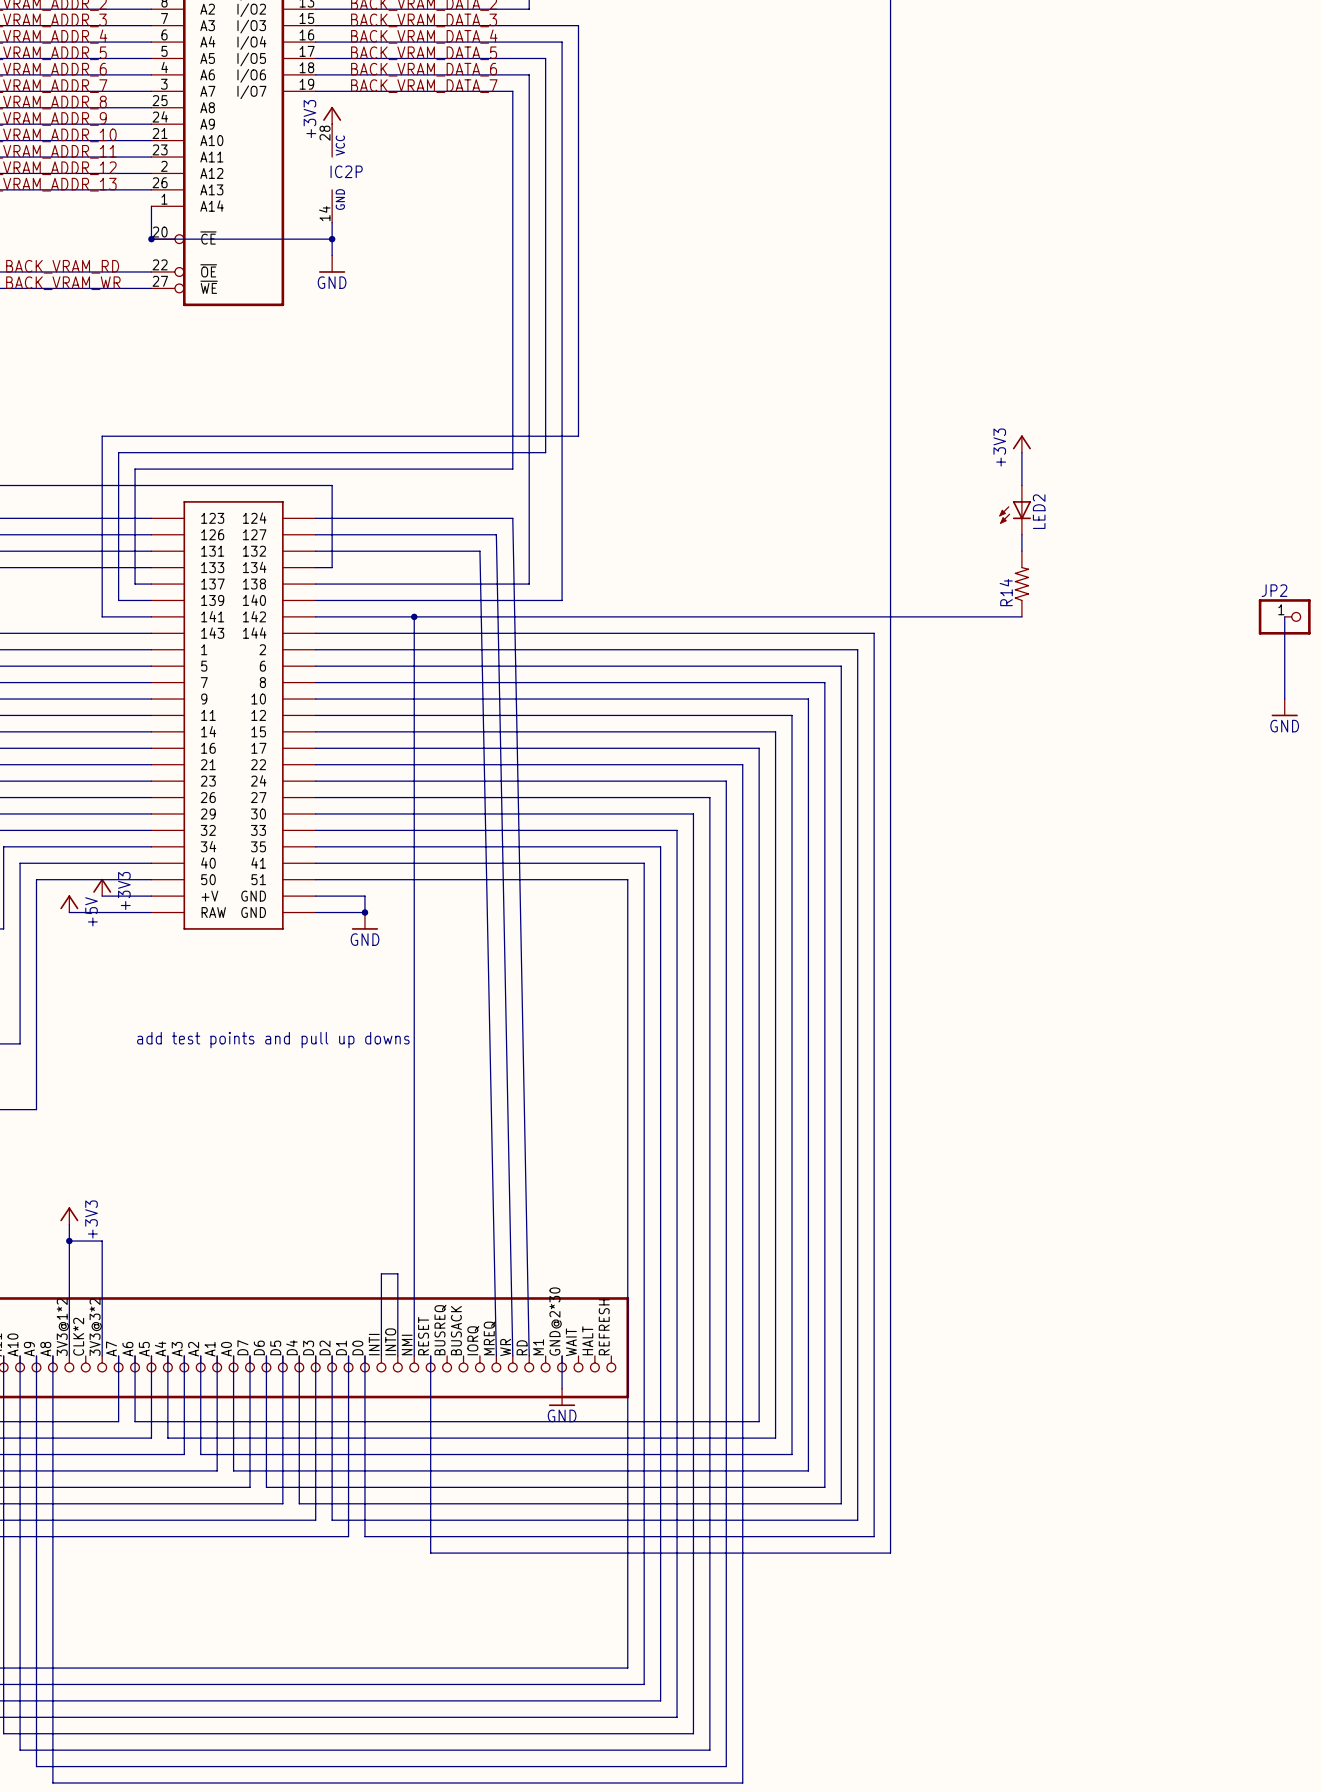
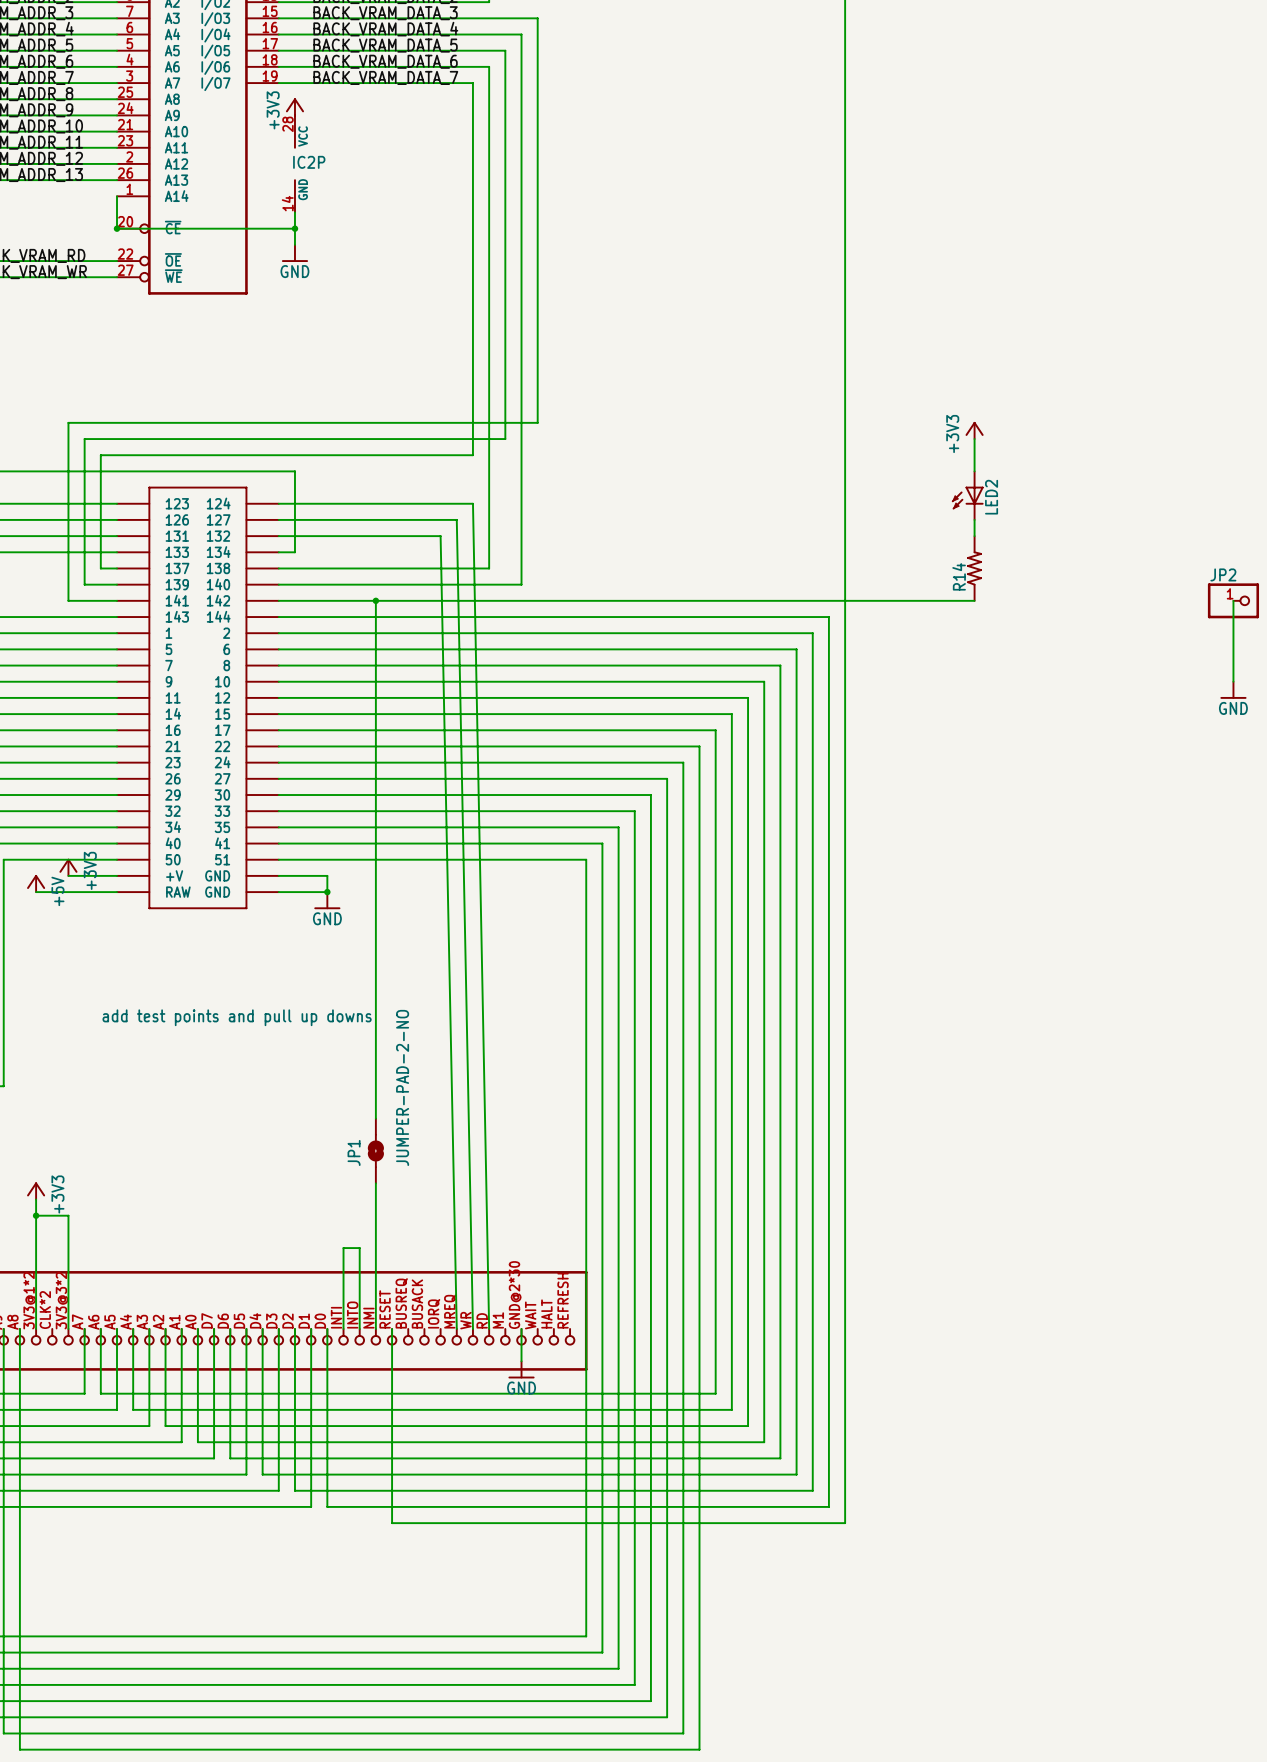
JP1: none -> JUMPER-PAD-2-NO (375, 1150)

